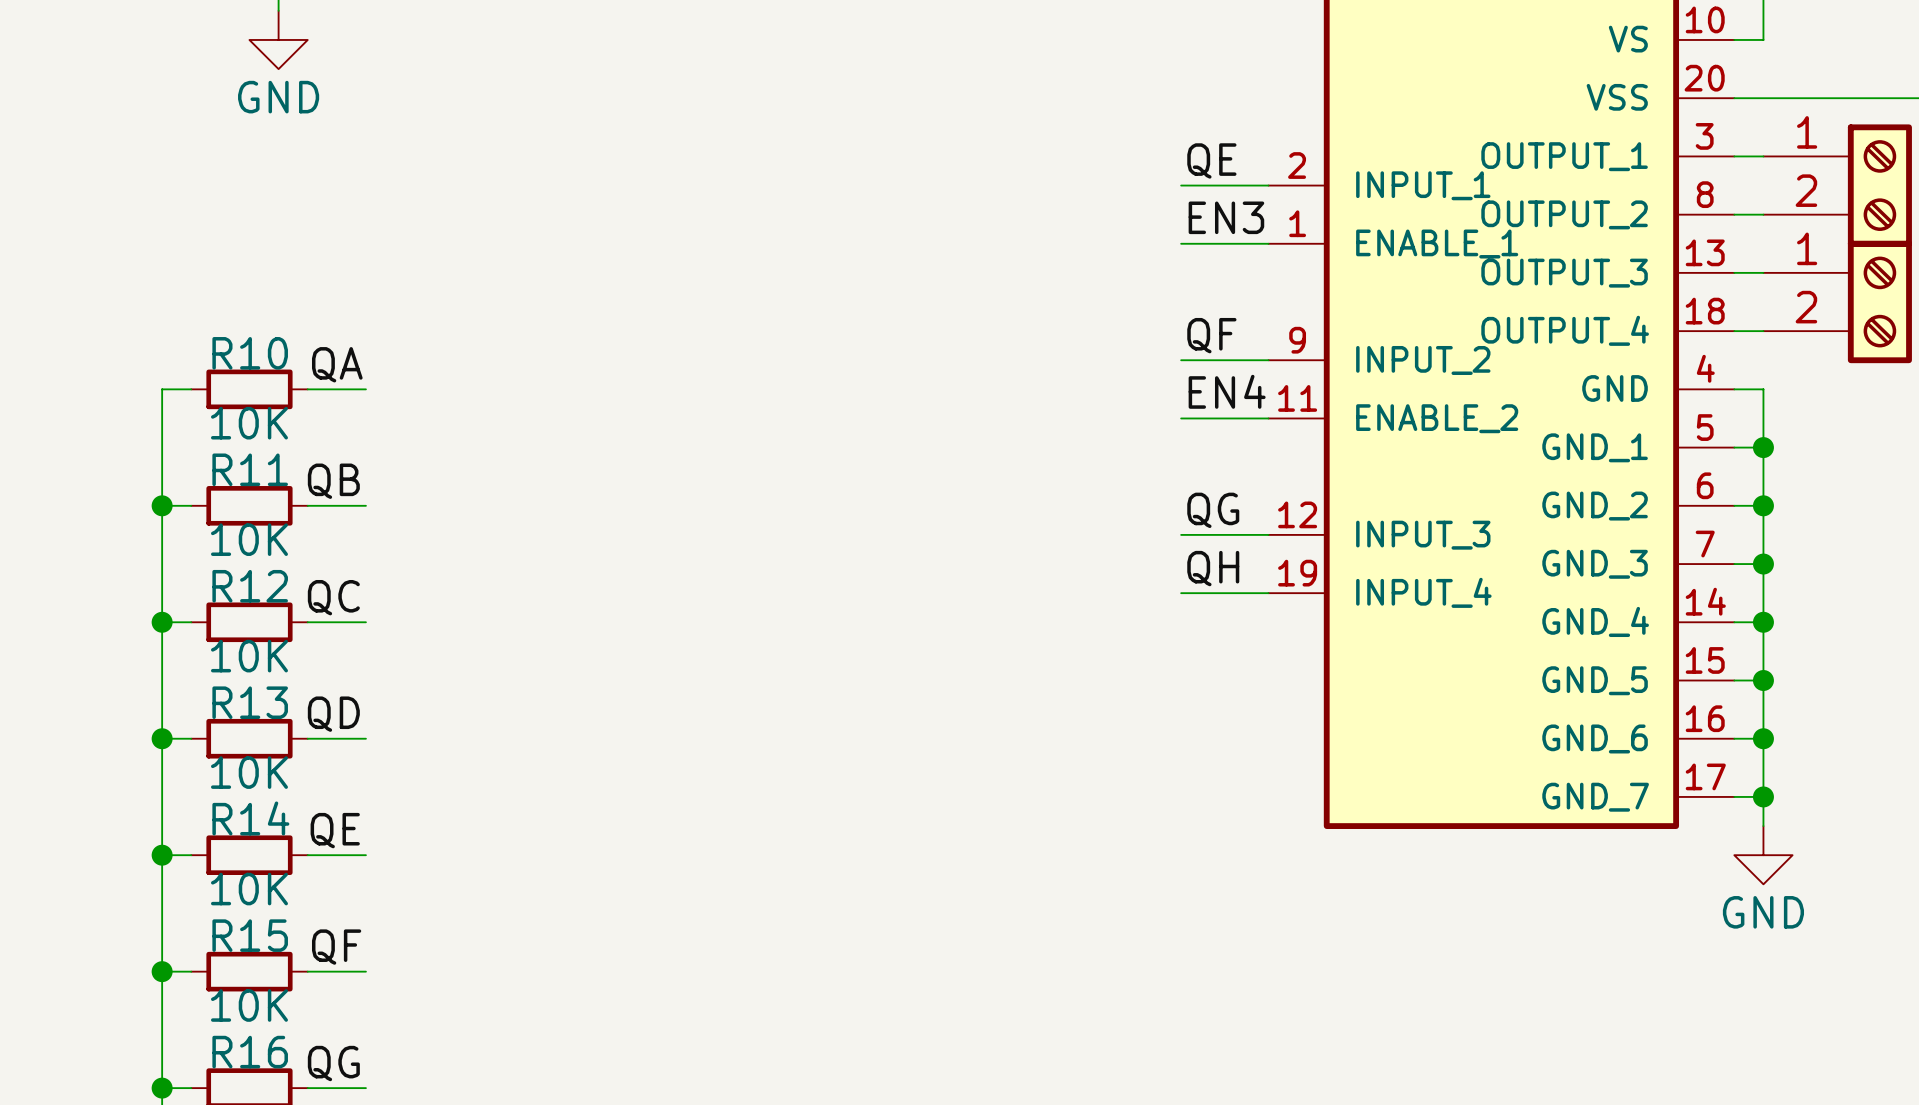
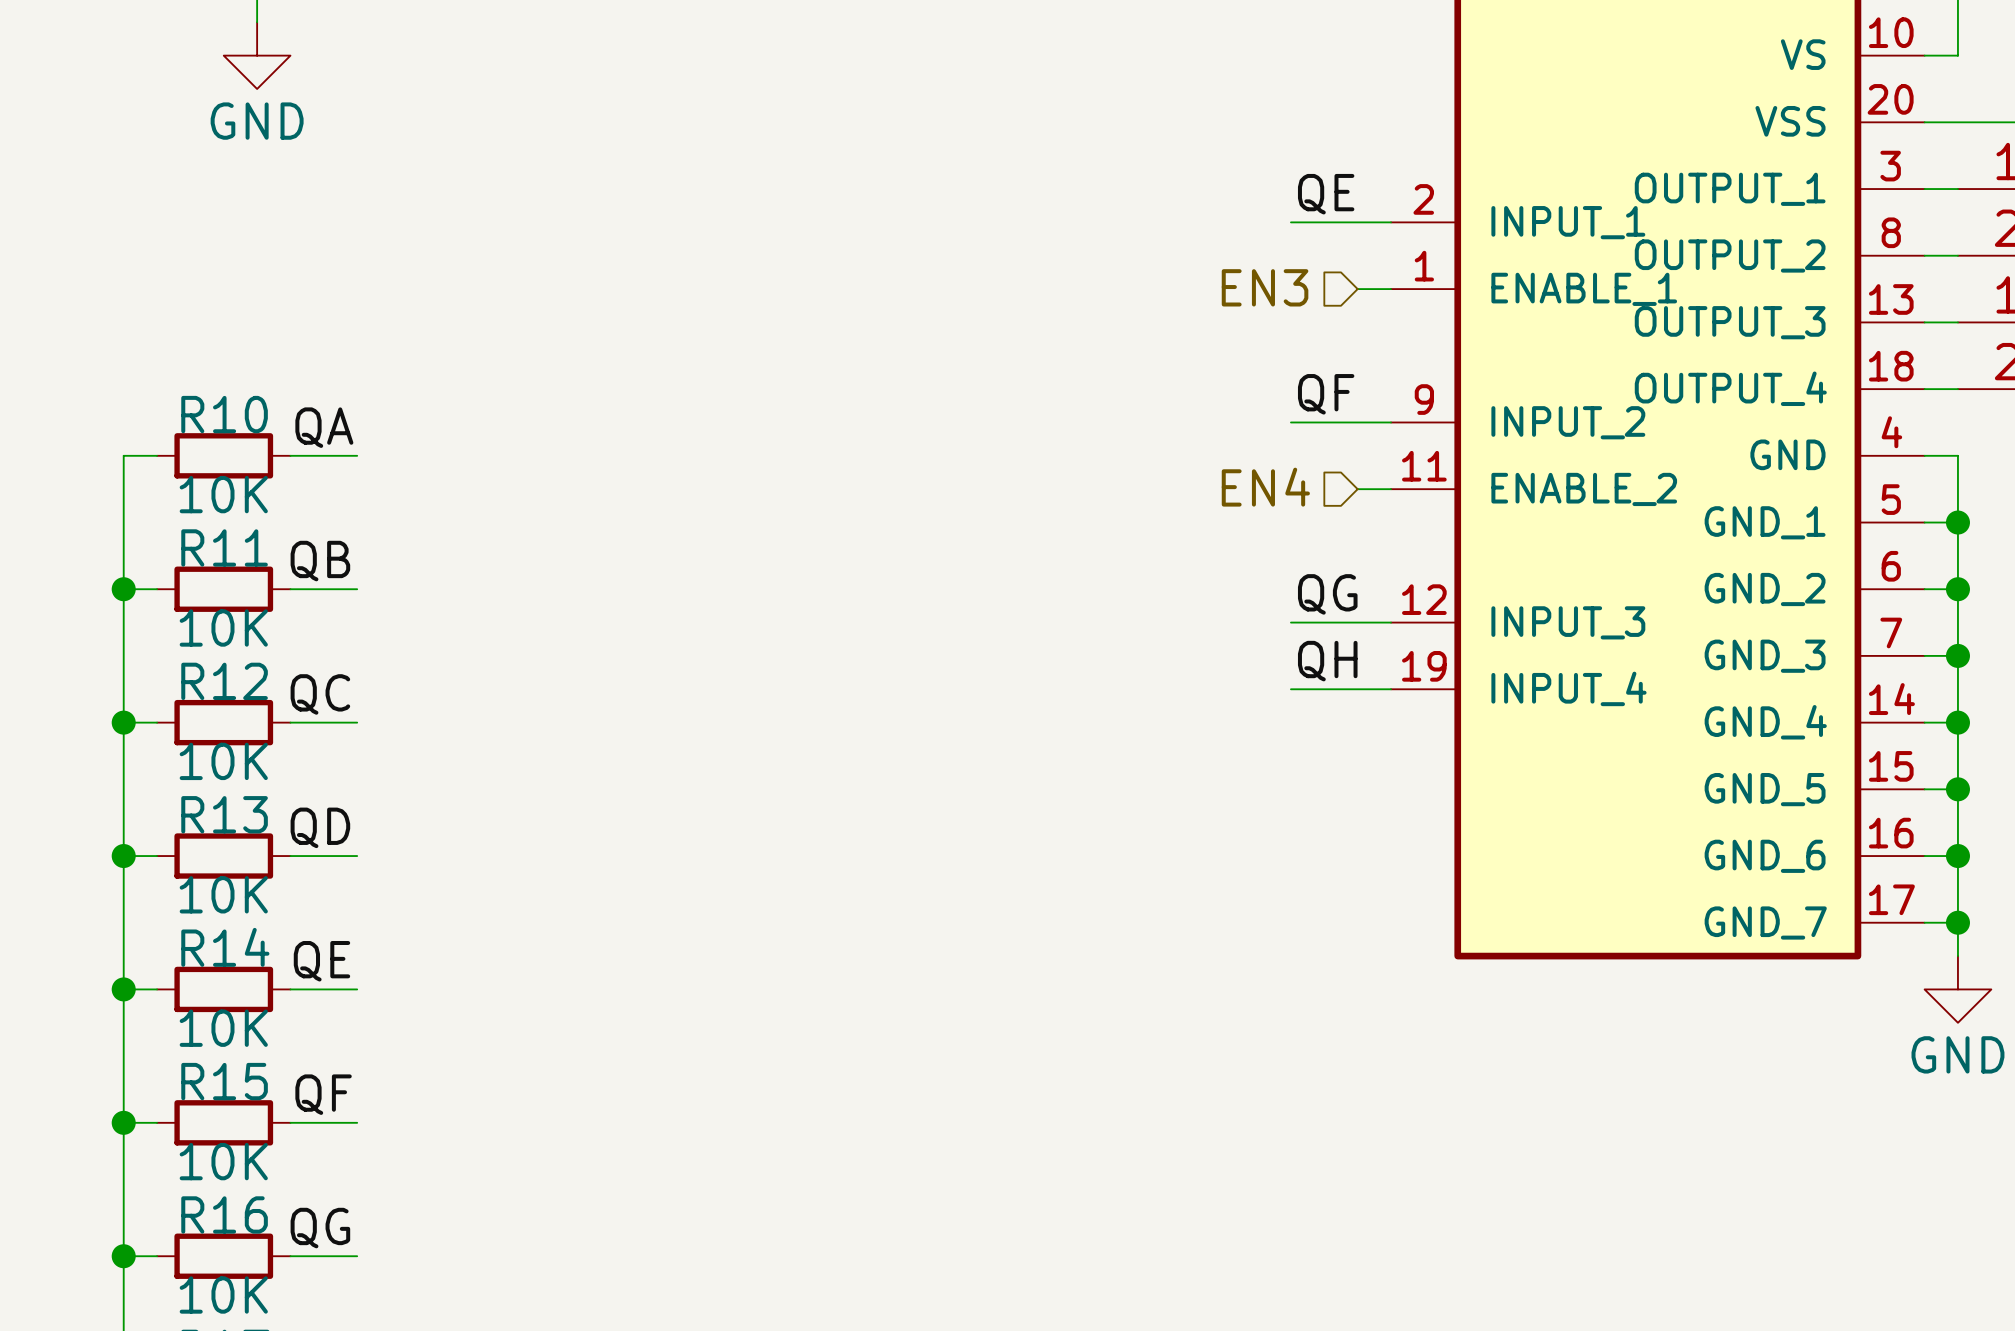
label: EN3 (1226, 217) -> none
hierarchical label: none -> EN3 (1265, 287)
wire: (1181, 243) (1239, 243) -> none
label: EN4 (1227, 391) -> none
hierarchical label: none -> EN4 (1265, 487)
wire: (1181, 418) (1239, 418) -> none

